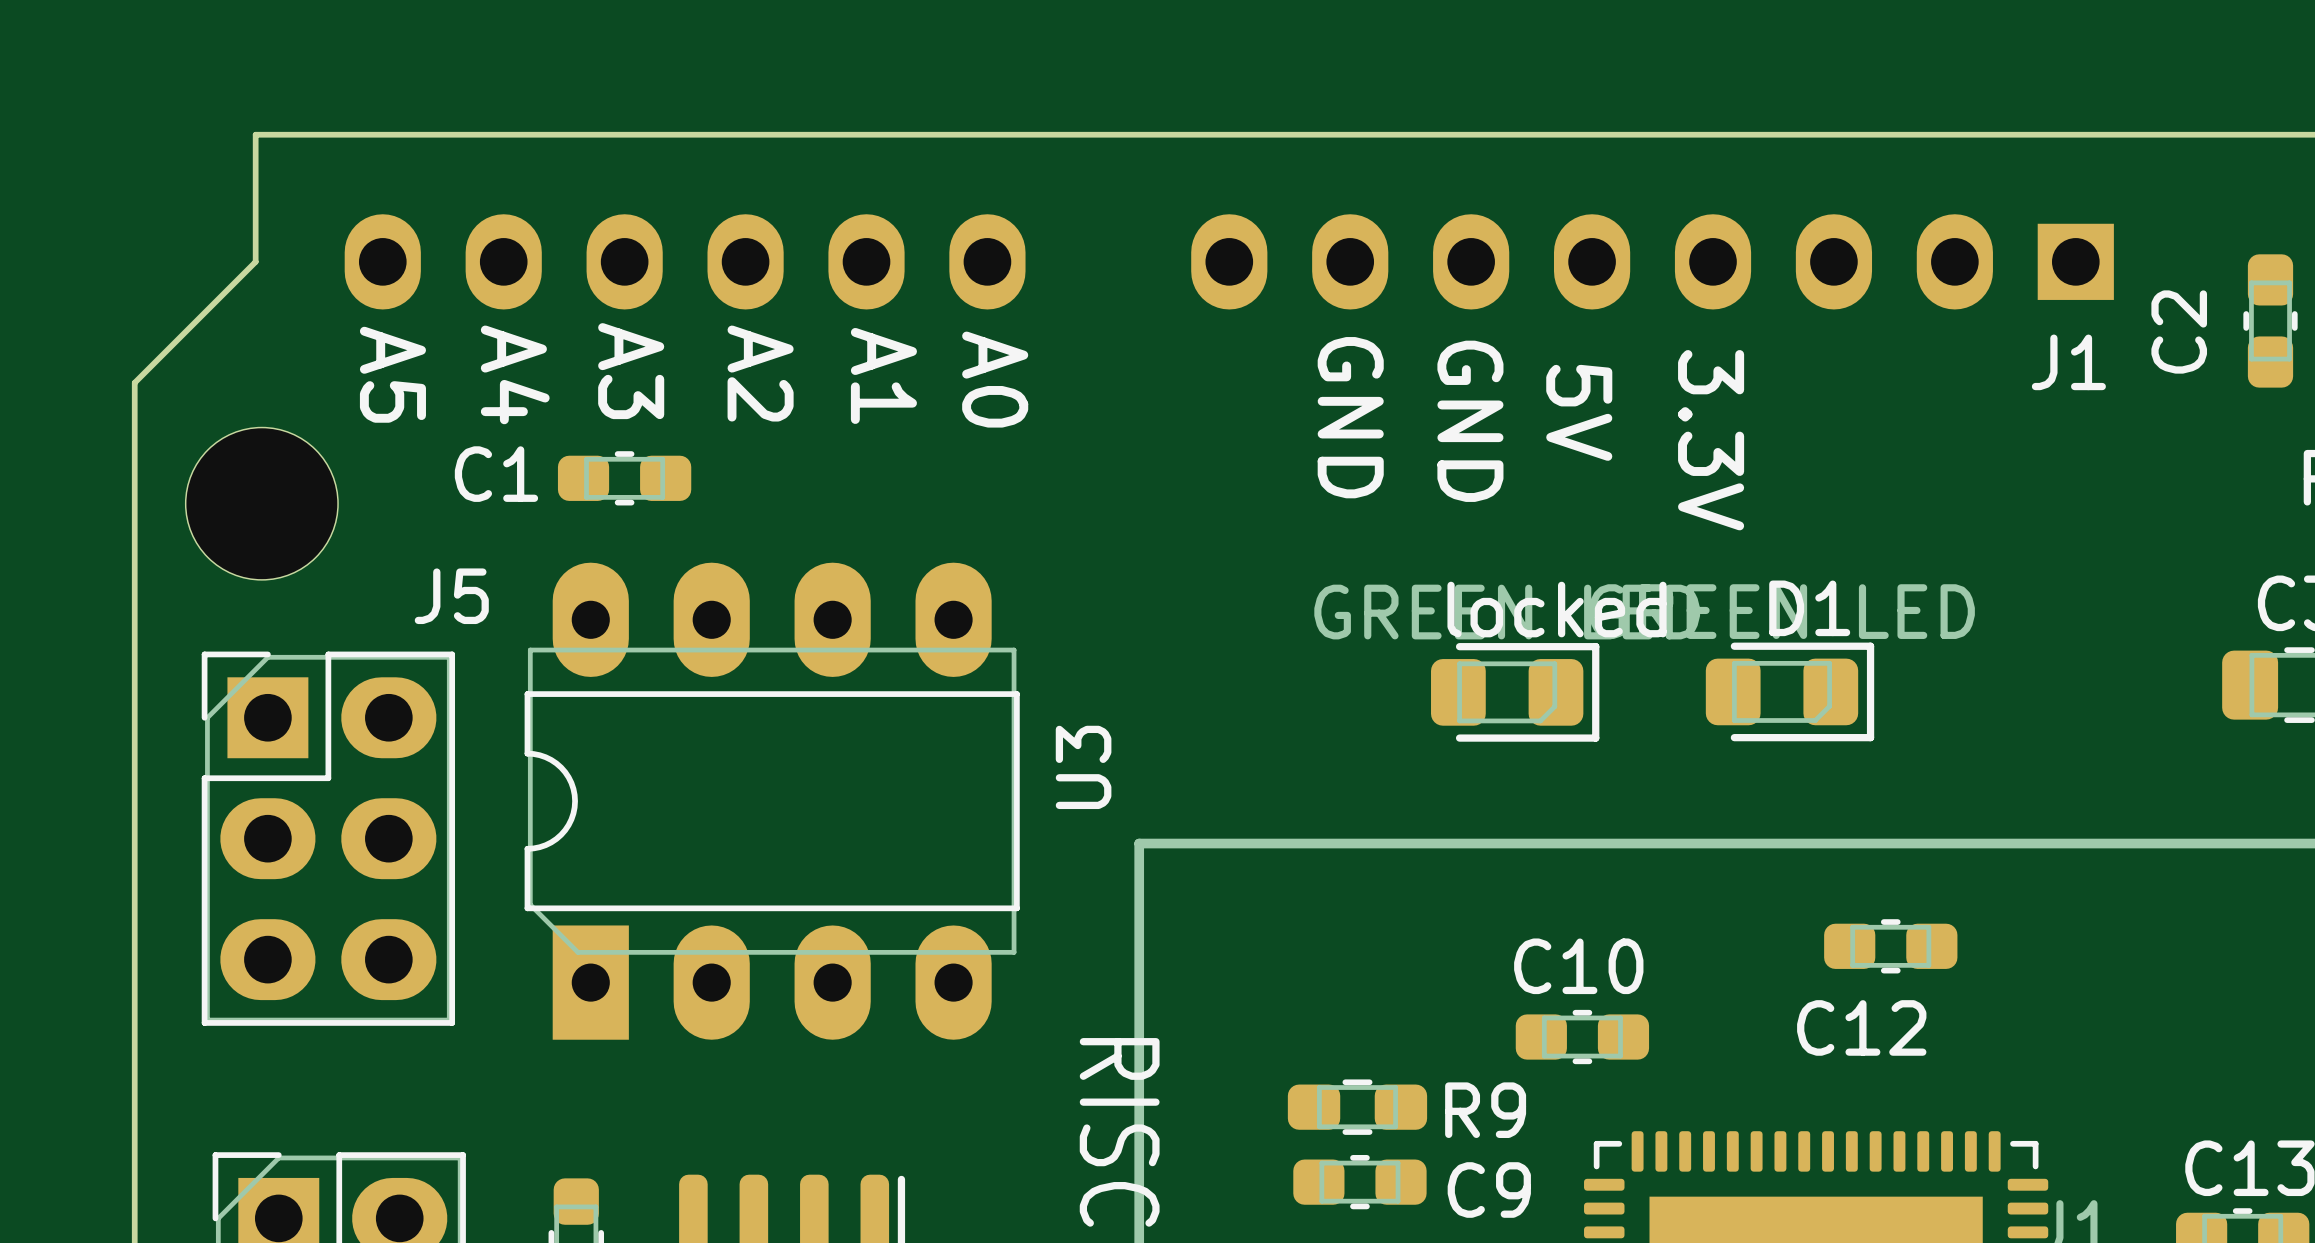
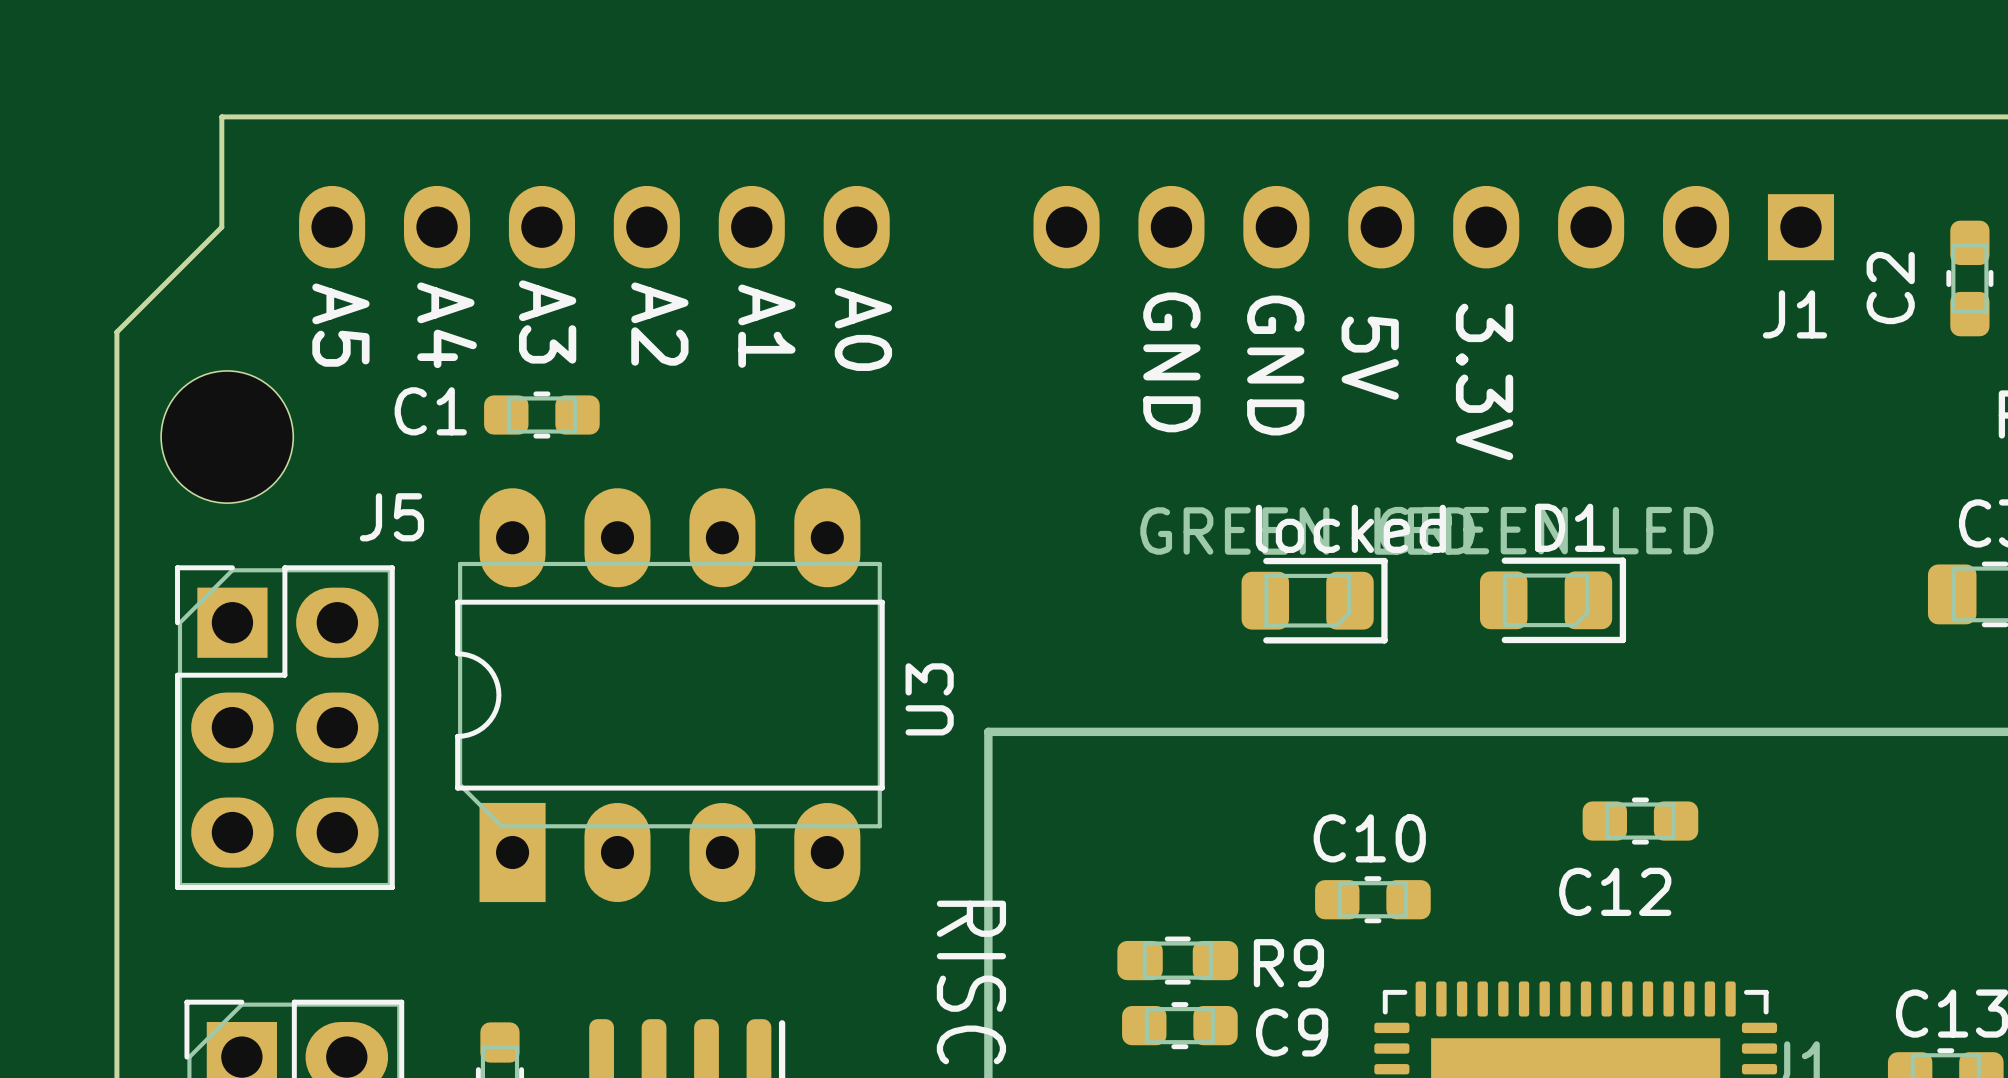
U3 name position: U3 (1083, 767) -> U3 (929, 699)

